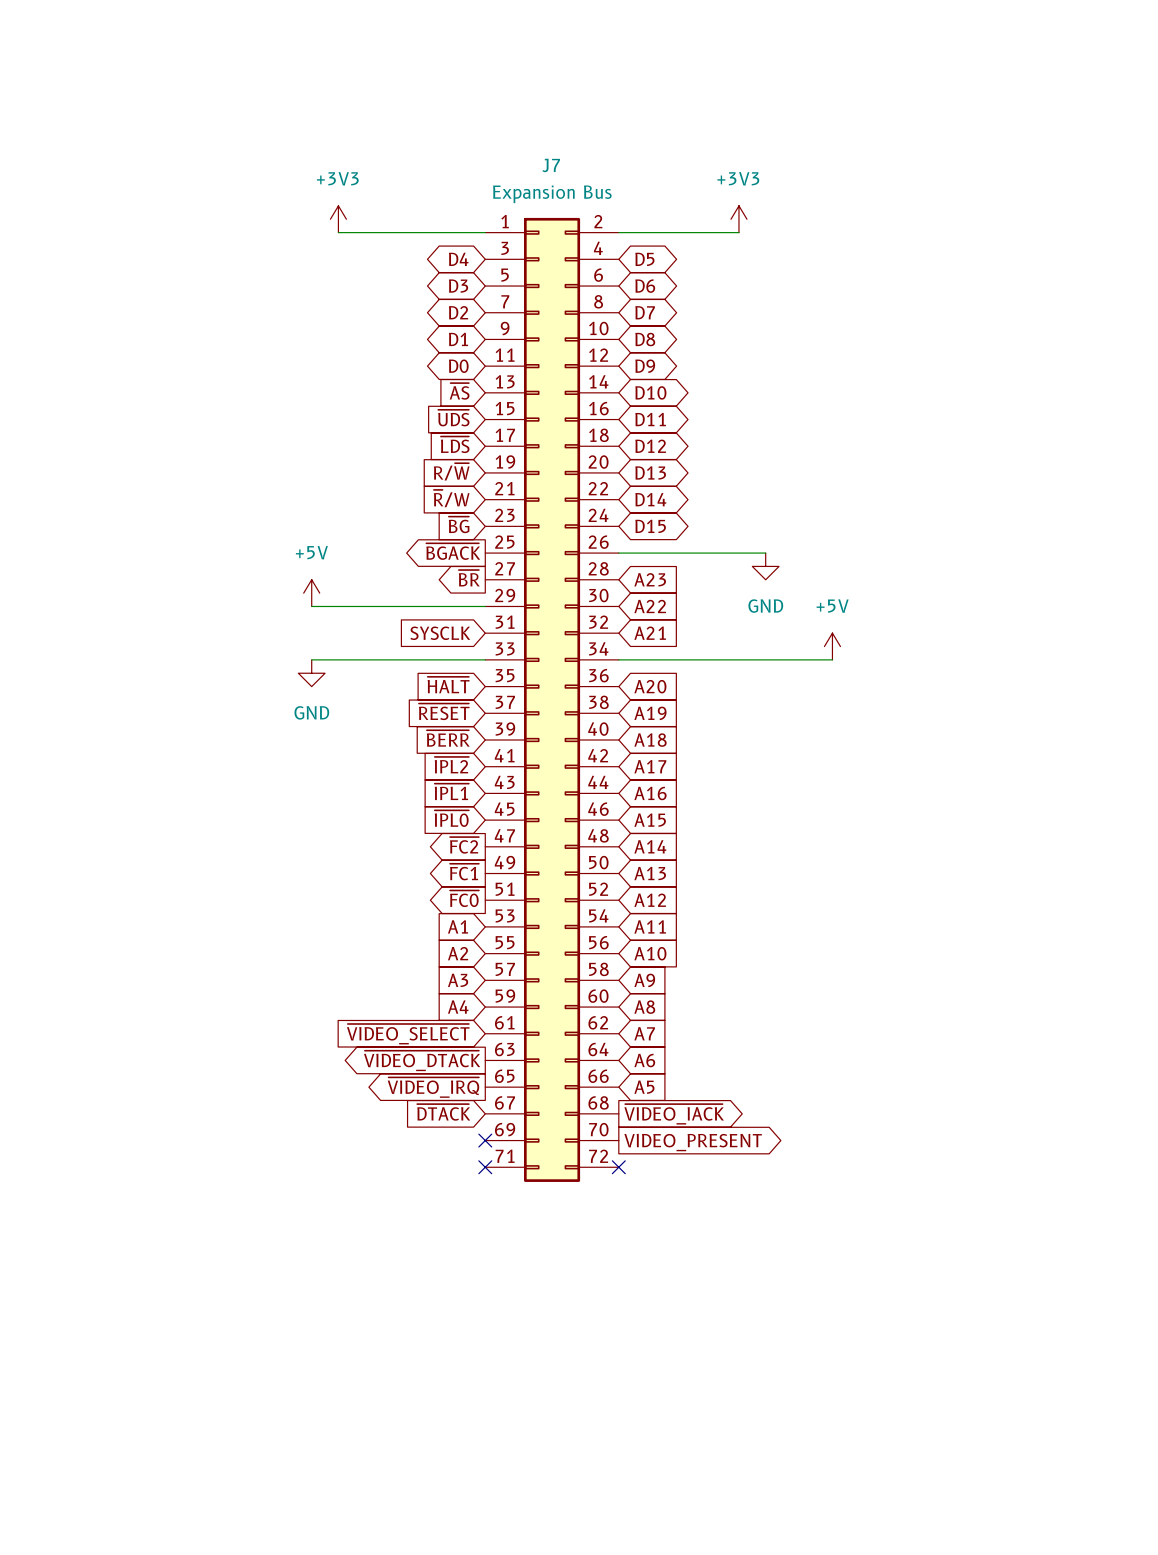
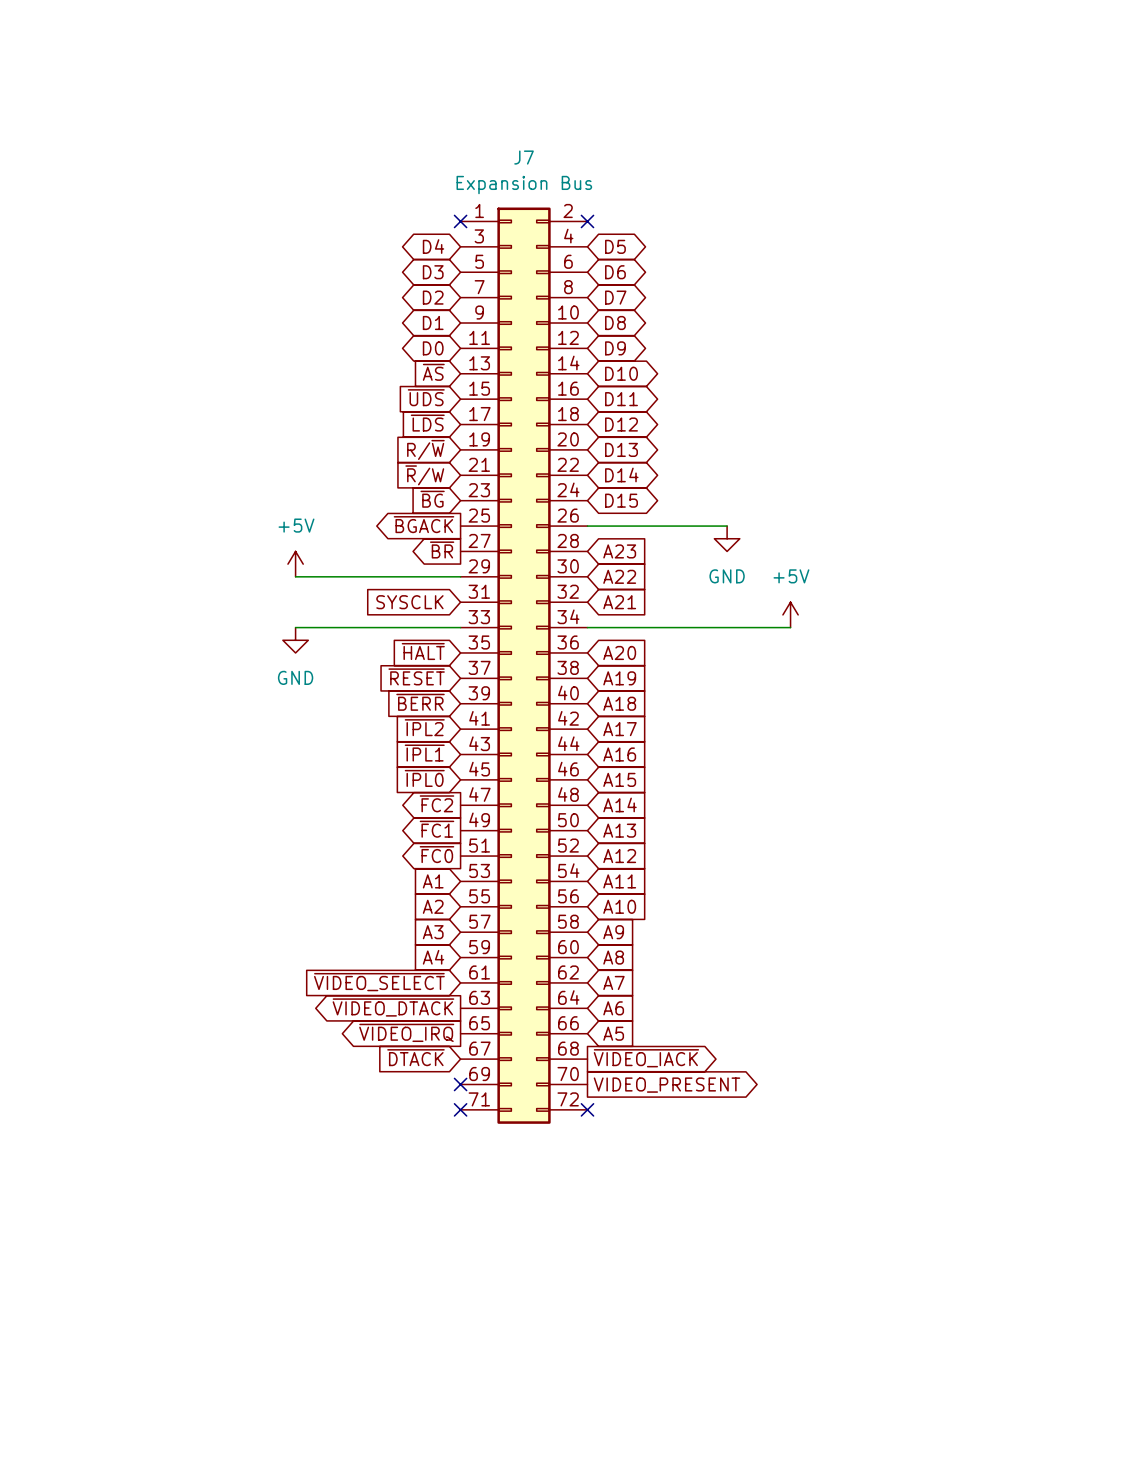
power symbol: +3V3 (338, 219) -> none
power symbol: +3V3 (738, 219) -> none
wire: (338, 232) (485, 232) -> none
no-connect mark: none -> (460, 221)
wire: (618, 232) (738, 232) -> none
no-connect mark: none -> (587, 221)

